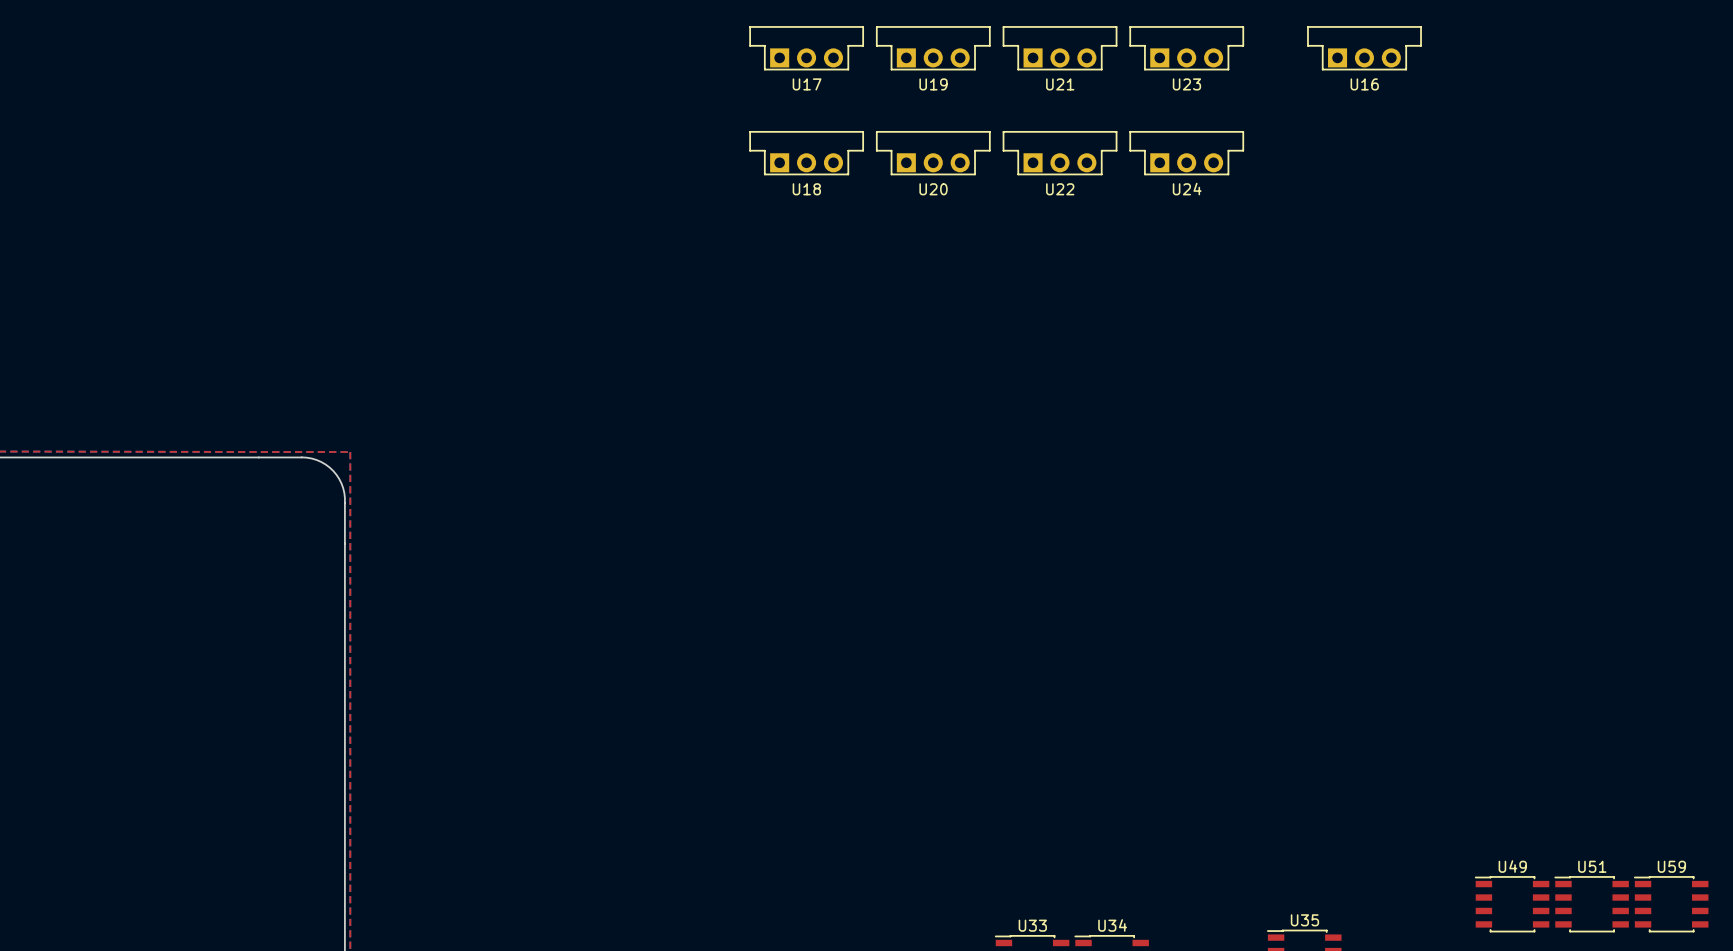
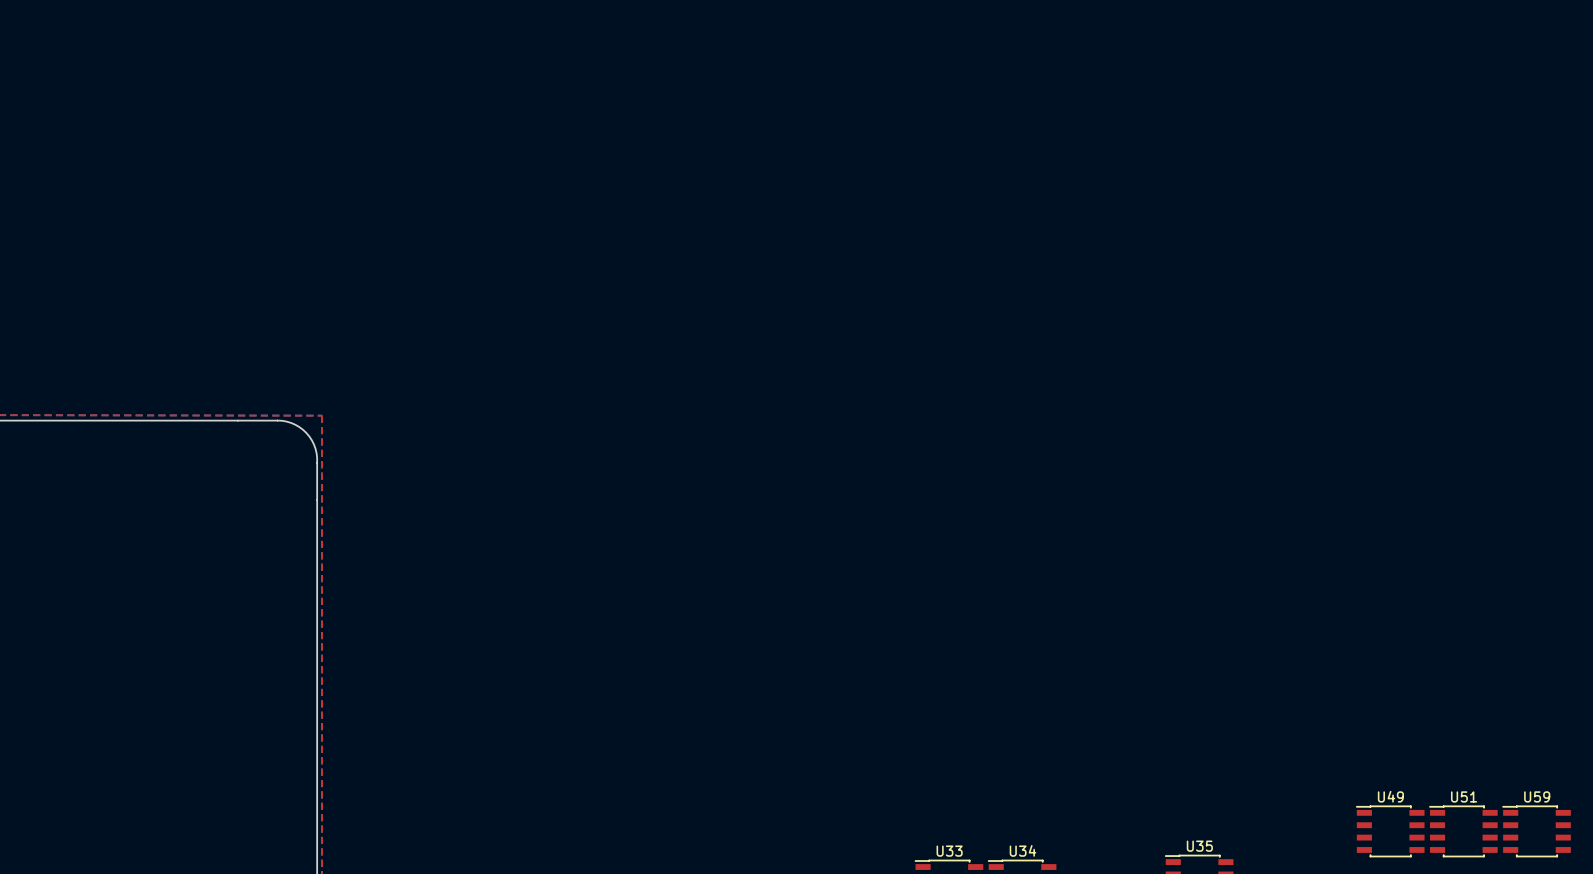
U17: (806, 48) -> none
U19: (933, 48) -> none
U21: (1060, 48) -> none
U23: (1186, 48) -> none
U16: (1364, 48) -> none
U18: (806, 153) -> none
U20: (933, 153) -> none
U22: (1060, 153) -> none
U24: (1186, 153) -> none

